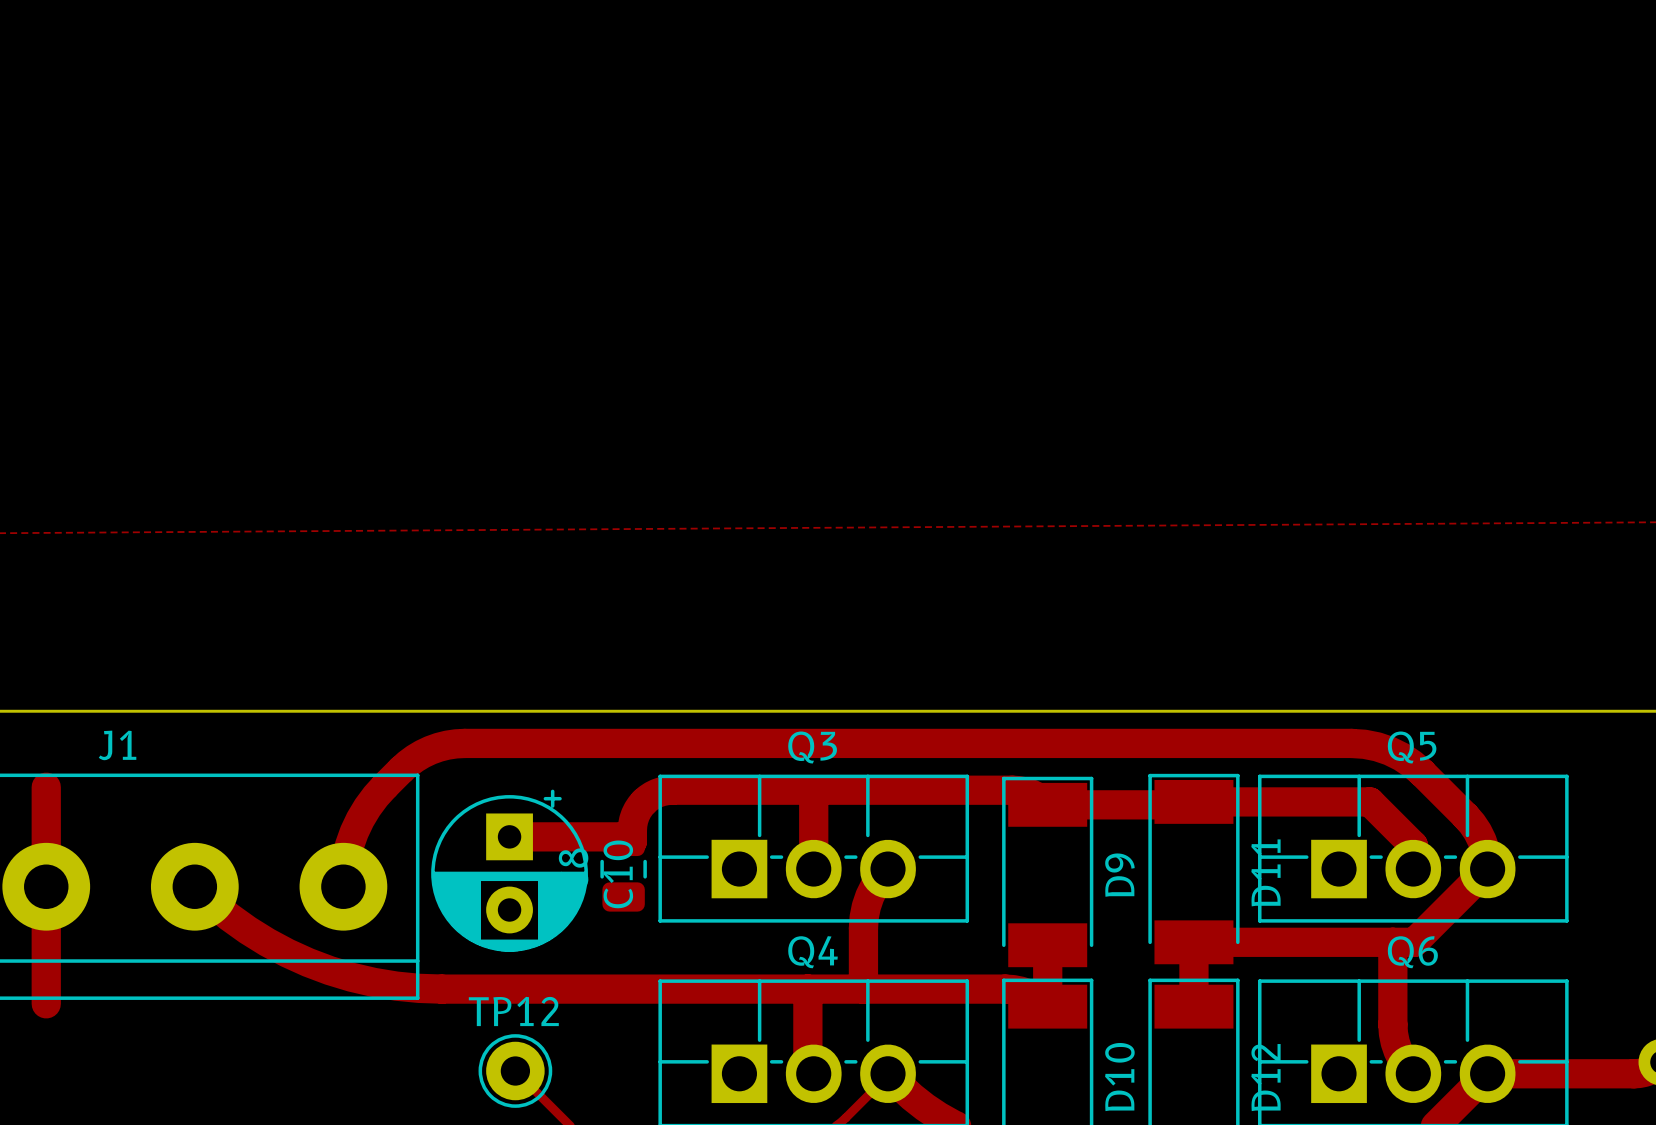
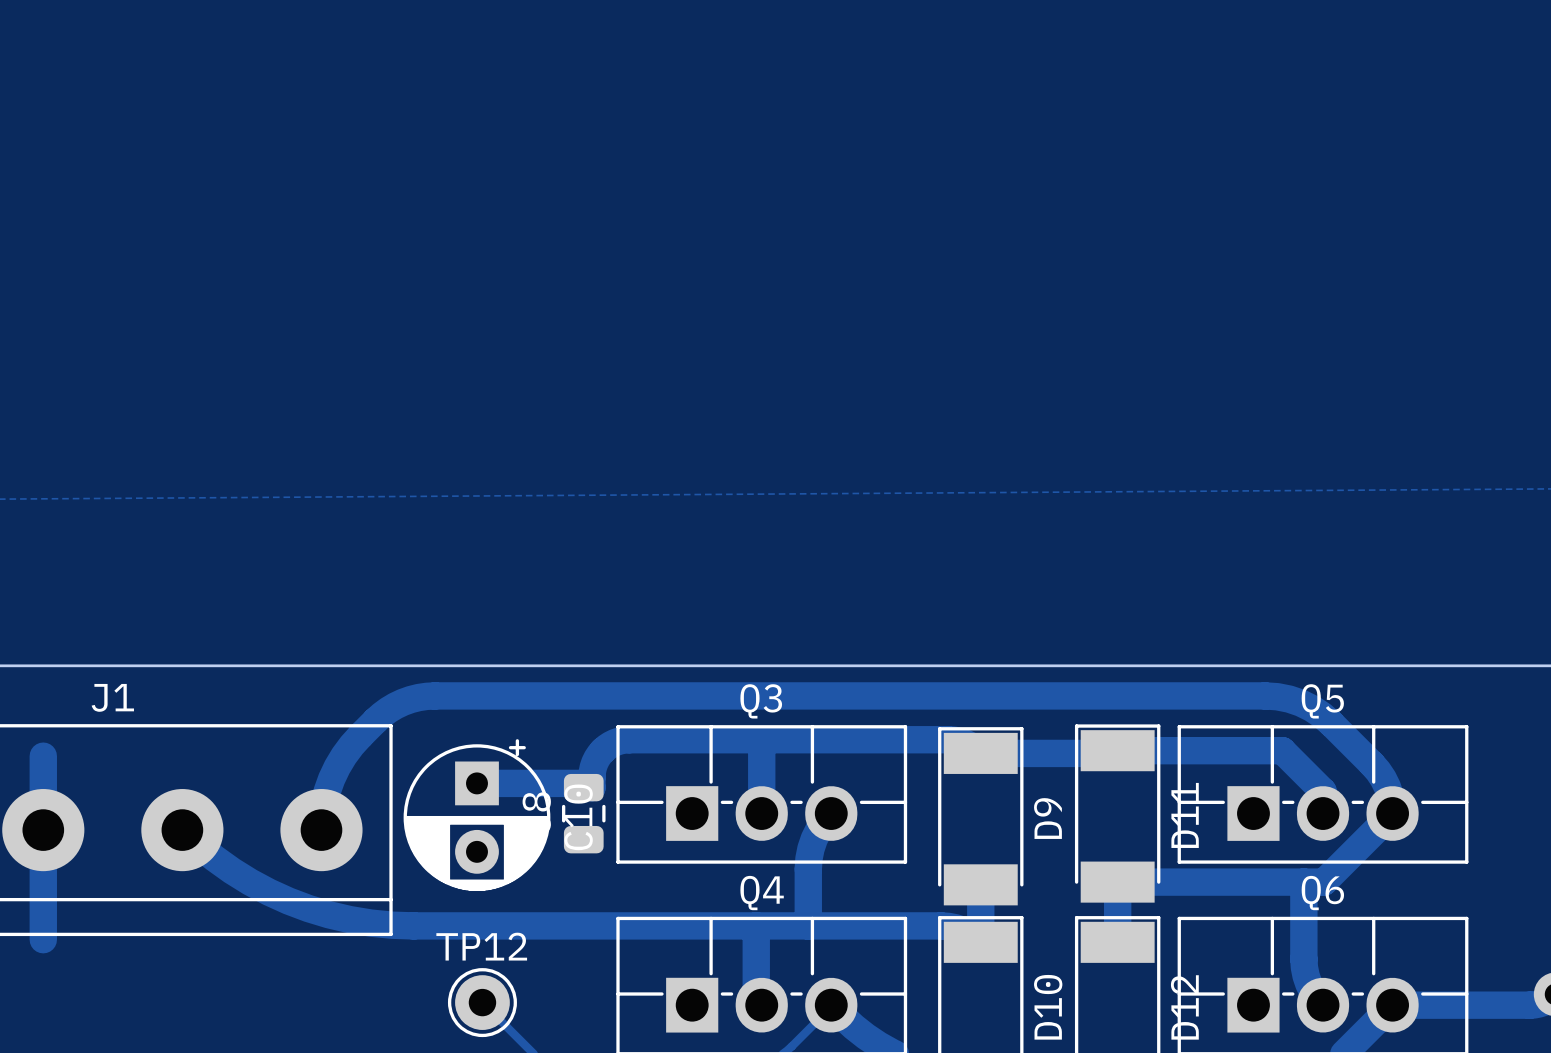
track: (46, 787) (46, 807) -> none

